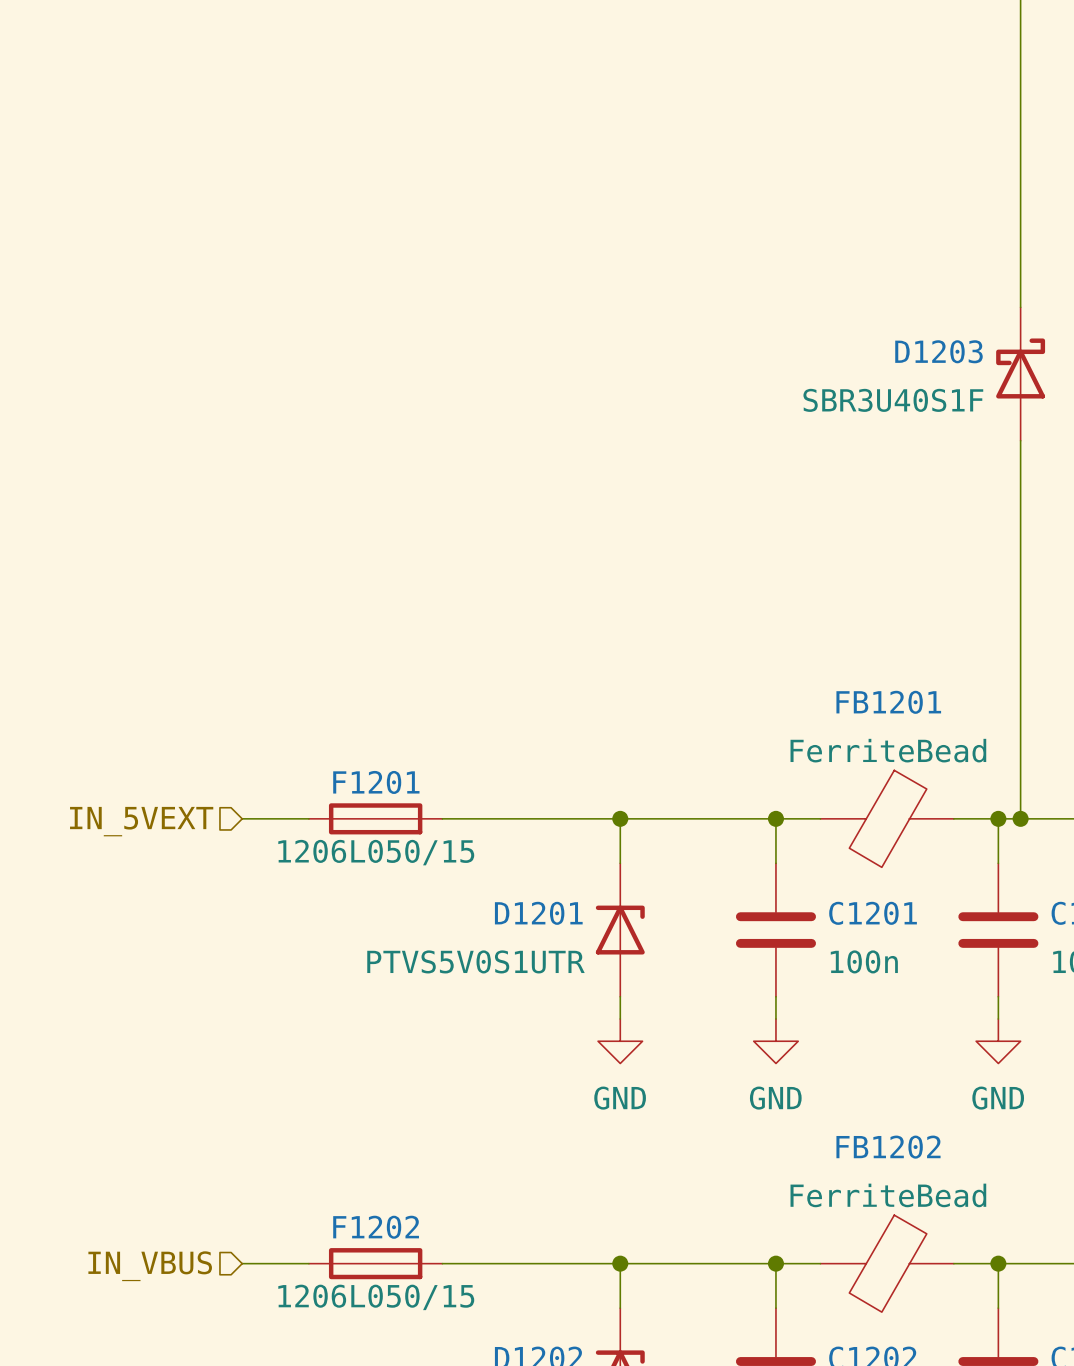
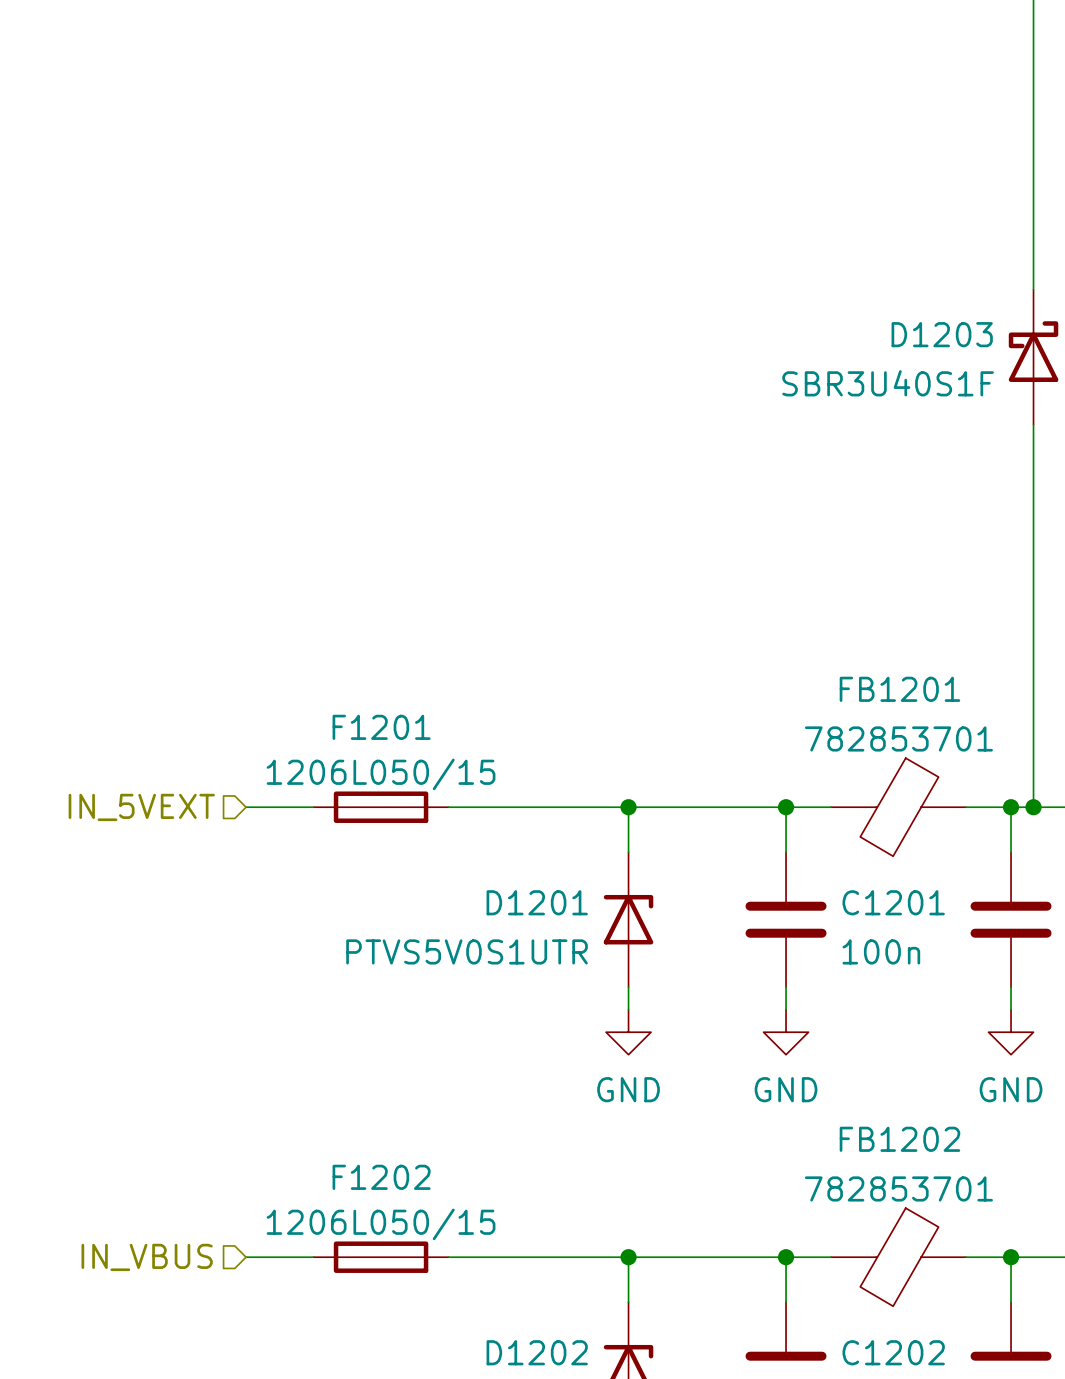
FB1201 value: FerriteBead (888, 750) -> 782853701 (898, 738)
F1201 name position: F1201 (376, 782) -> F1201 (381, 727)
F1201 value position: 1206L050/15 (376, 852) -> 1206L050/15 (381, 774)
FB1202 value: FerriteBead (888, 1195) -> 782853701 (898, 1188)
F1202 name position: F1202 (376, 1227) -> F1202 (381, 1177)
F1202 value position: 1206L050/15 (376, 1297) -> 1206L050/15 (381, 1224)

